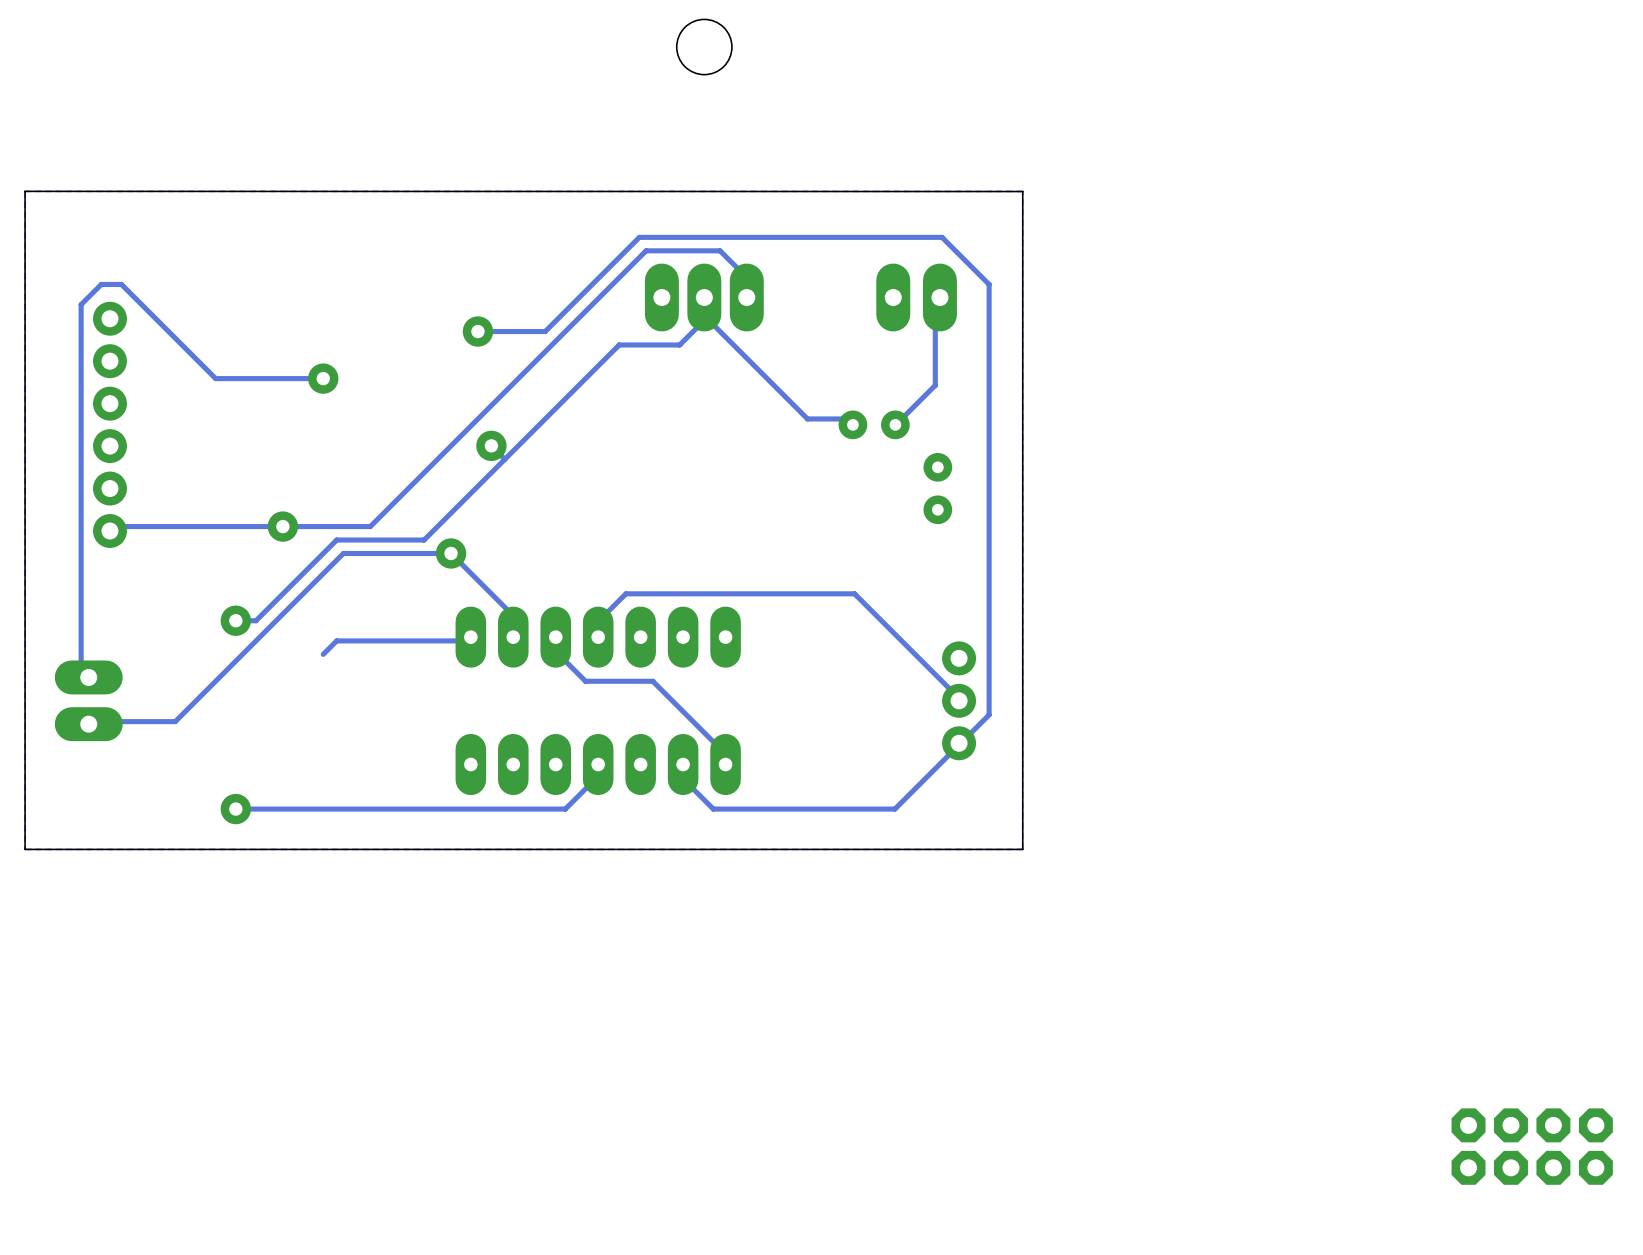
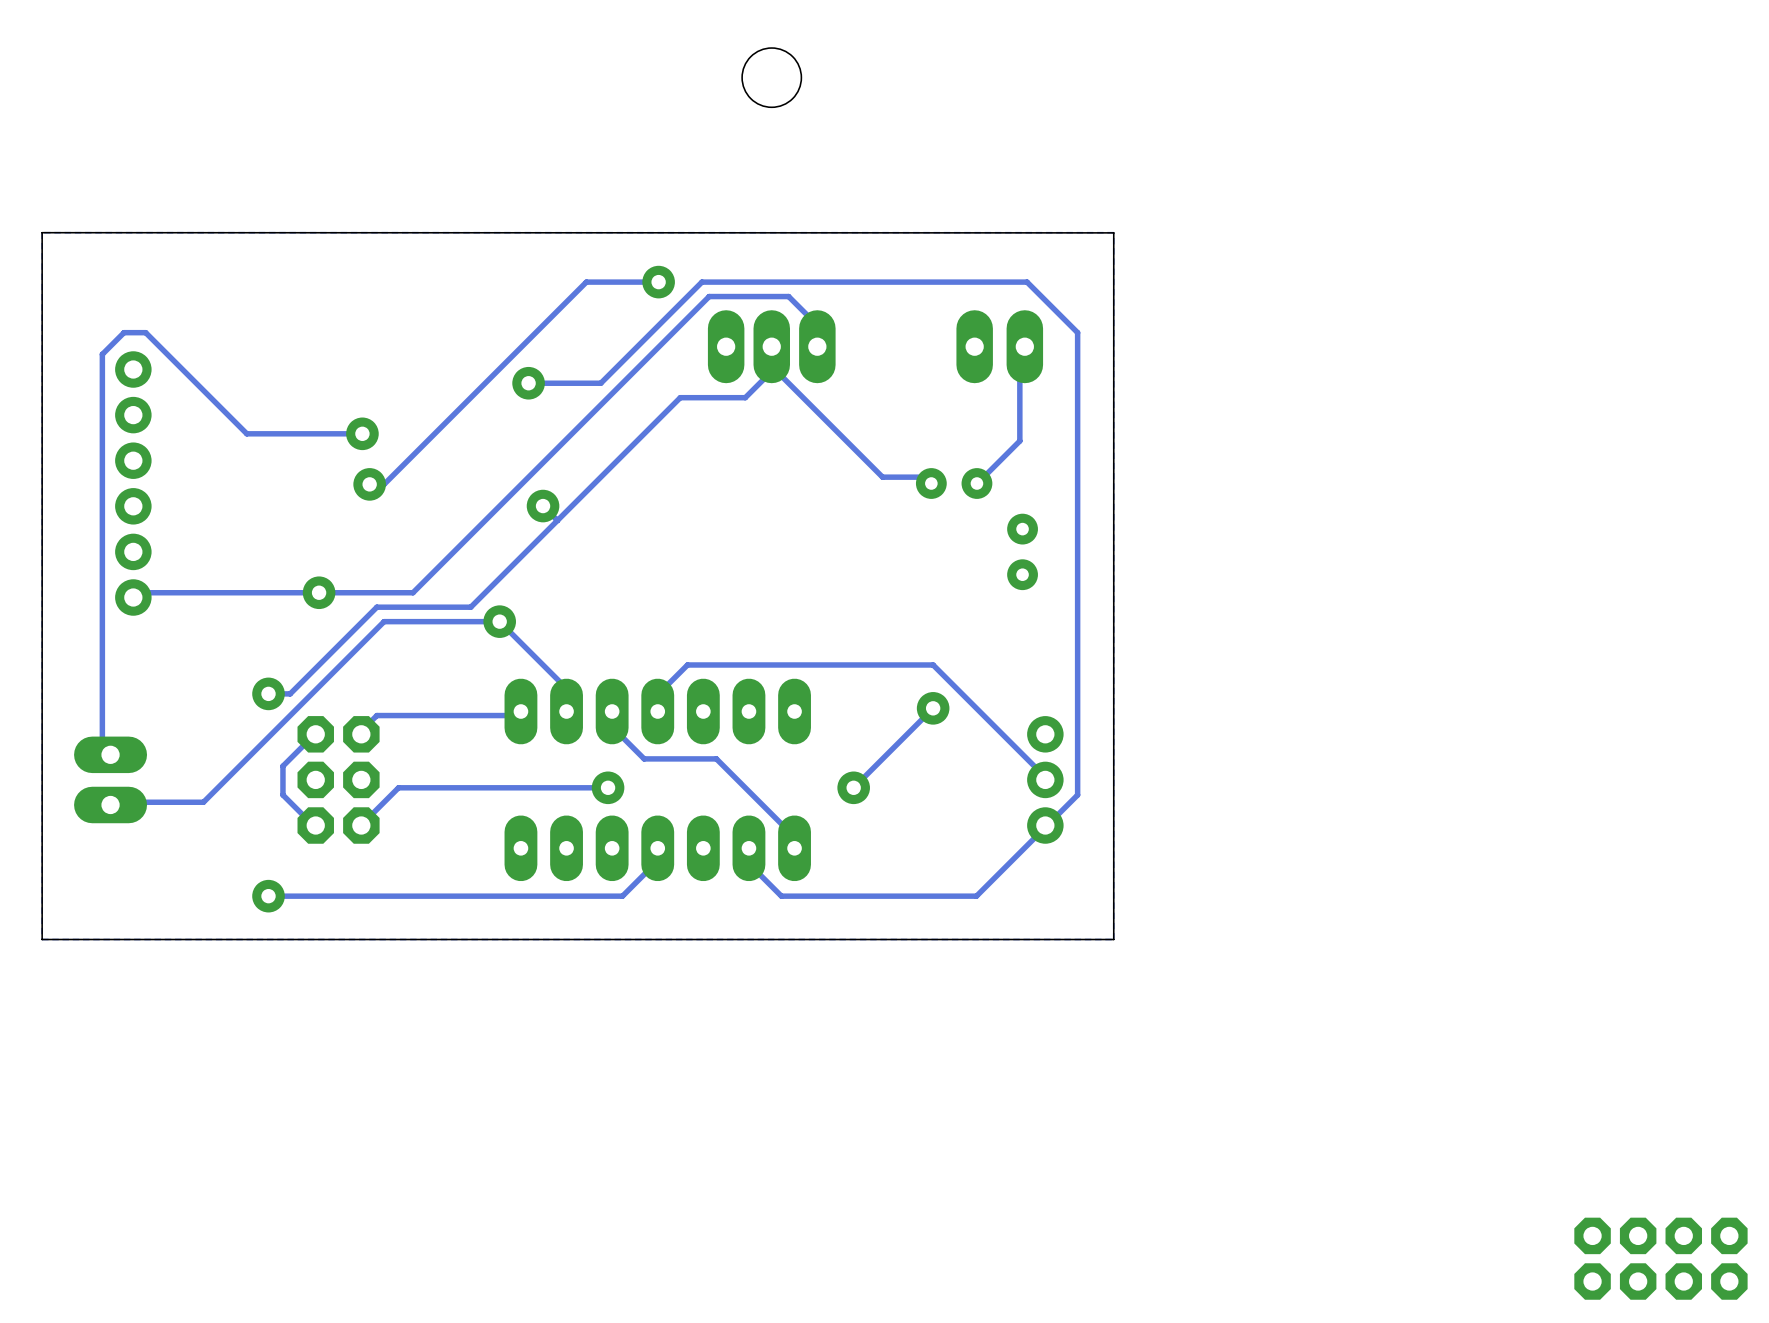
track: none -> (658, 282) (586, 282) (384, 484) (369, 484)
via: none -> (658, 282)
via: none -> (369, 484)
track: none -> (933, 708) (853, 787)
via: none -> (933, 708)
track: none -> (315, 734) (282, 766) (282, 795) (315, 825)
part: none -> (338, 779)
track: none -> (608, 787) (398, 787) (361, 825)
via: none -> (608, 787)
via: none -> (853, 787)

